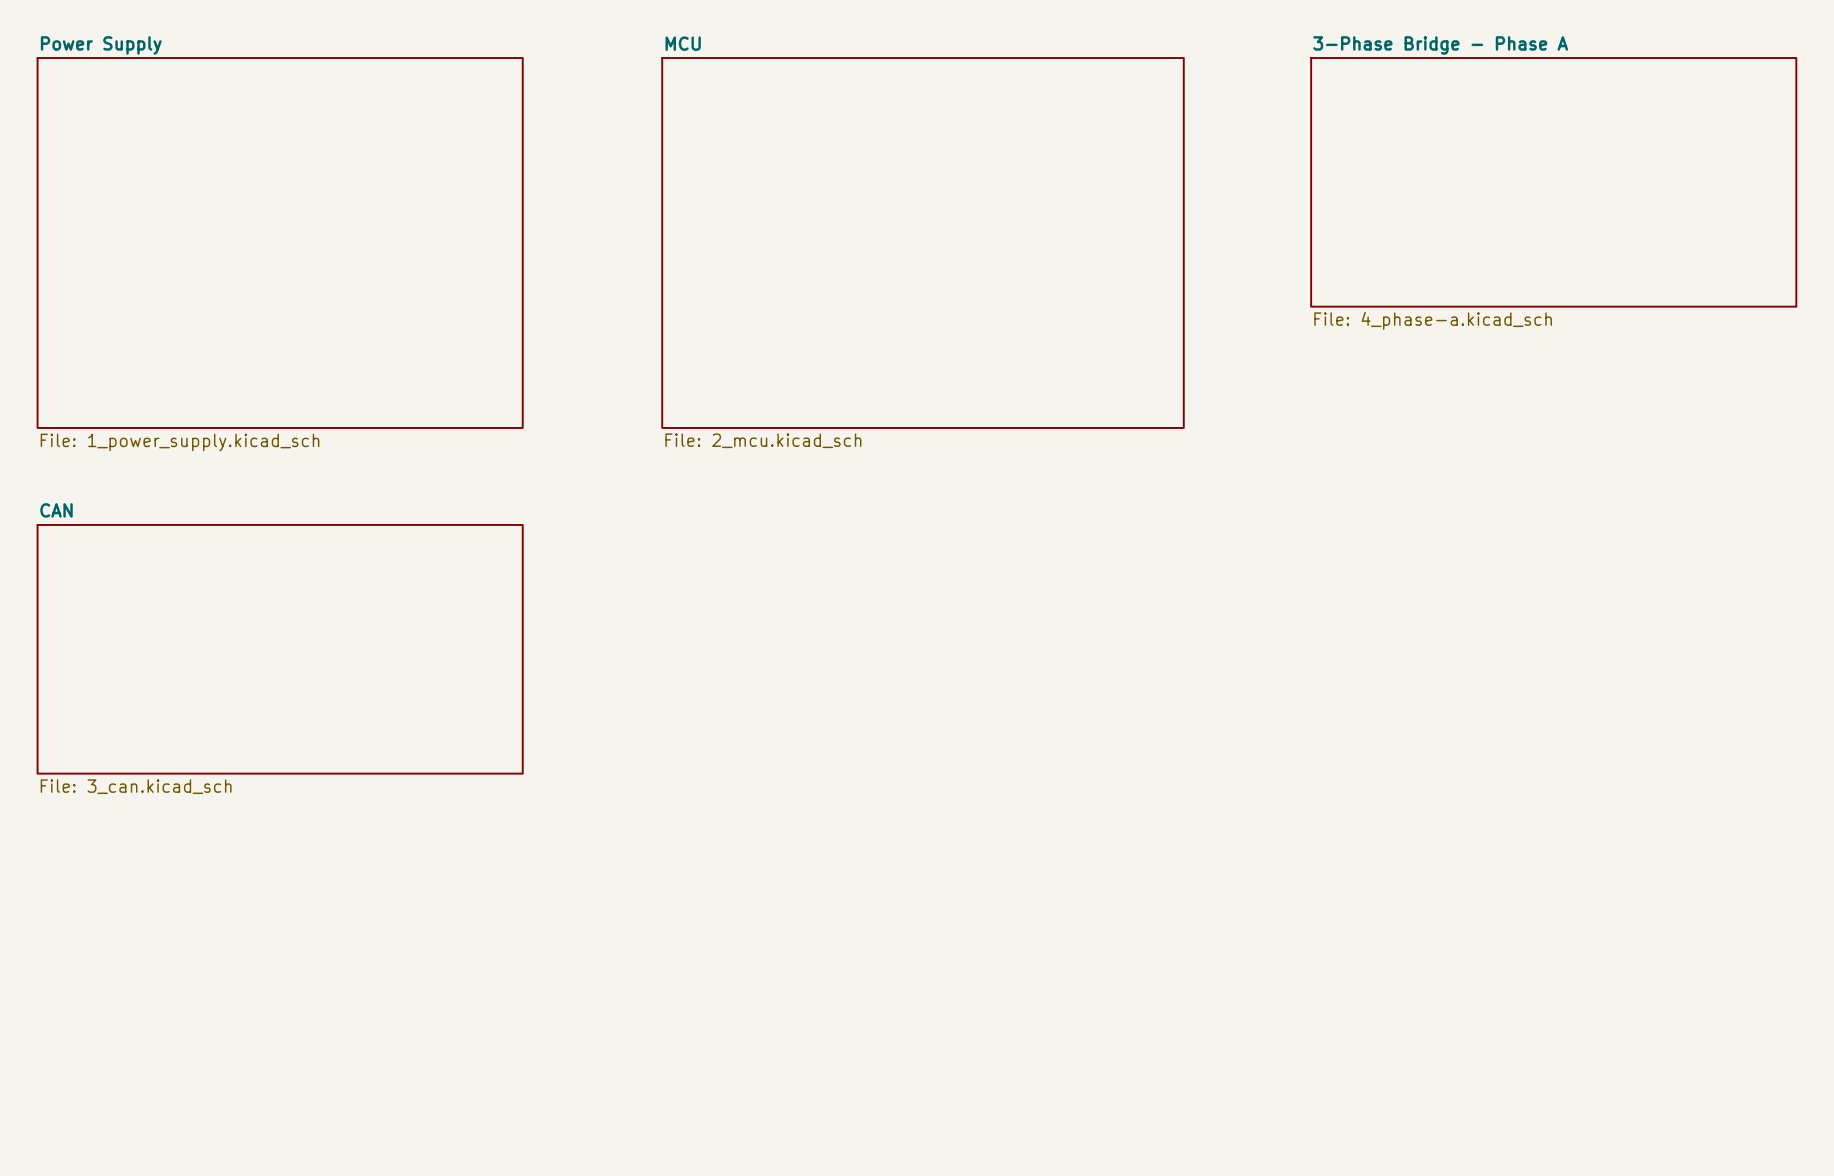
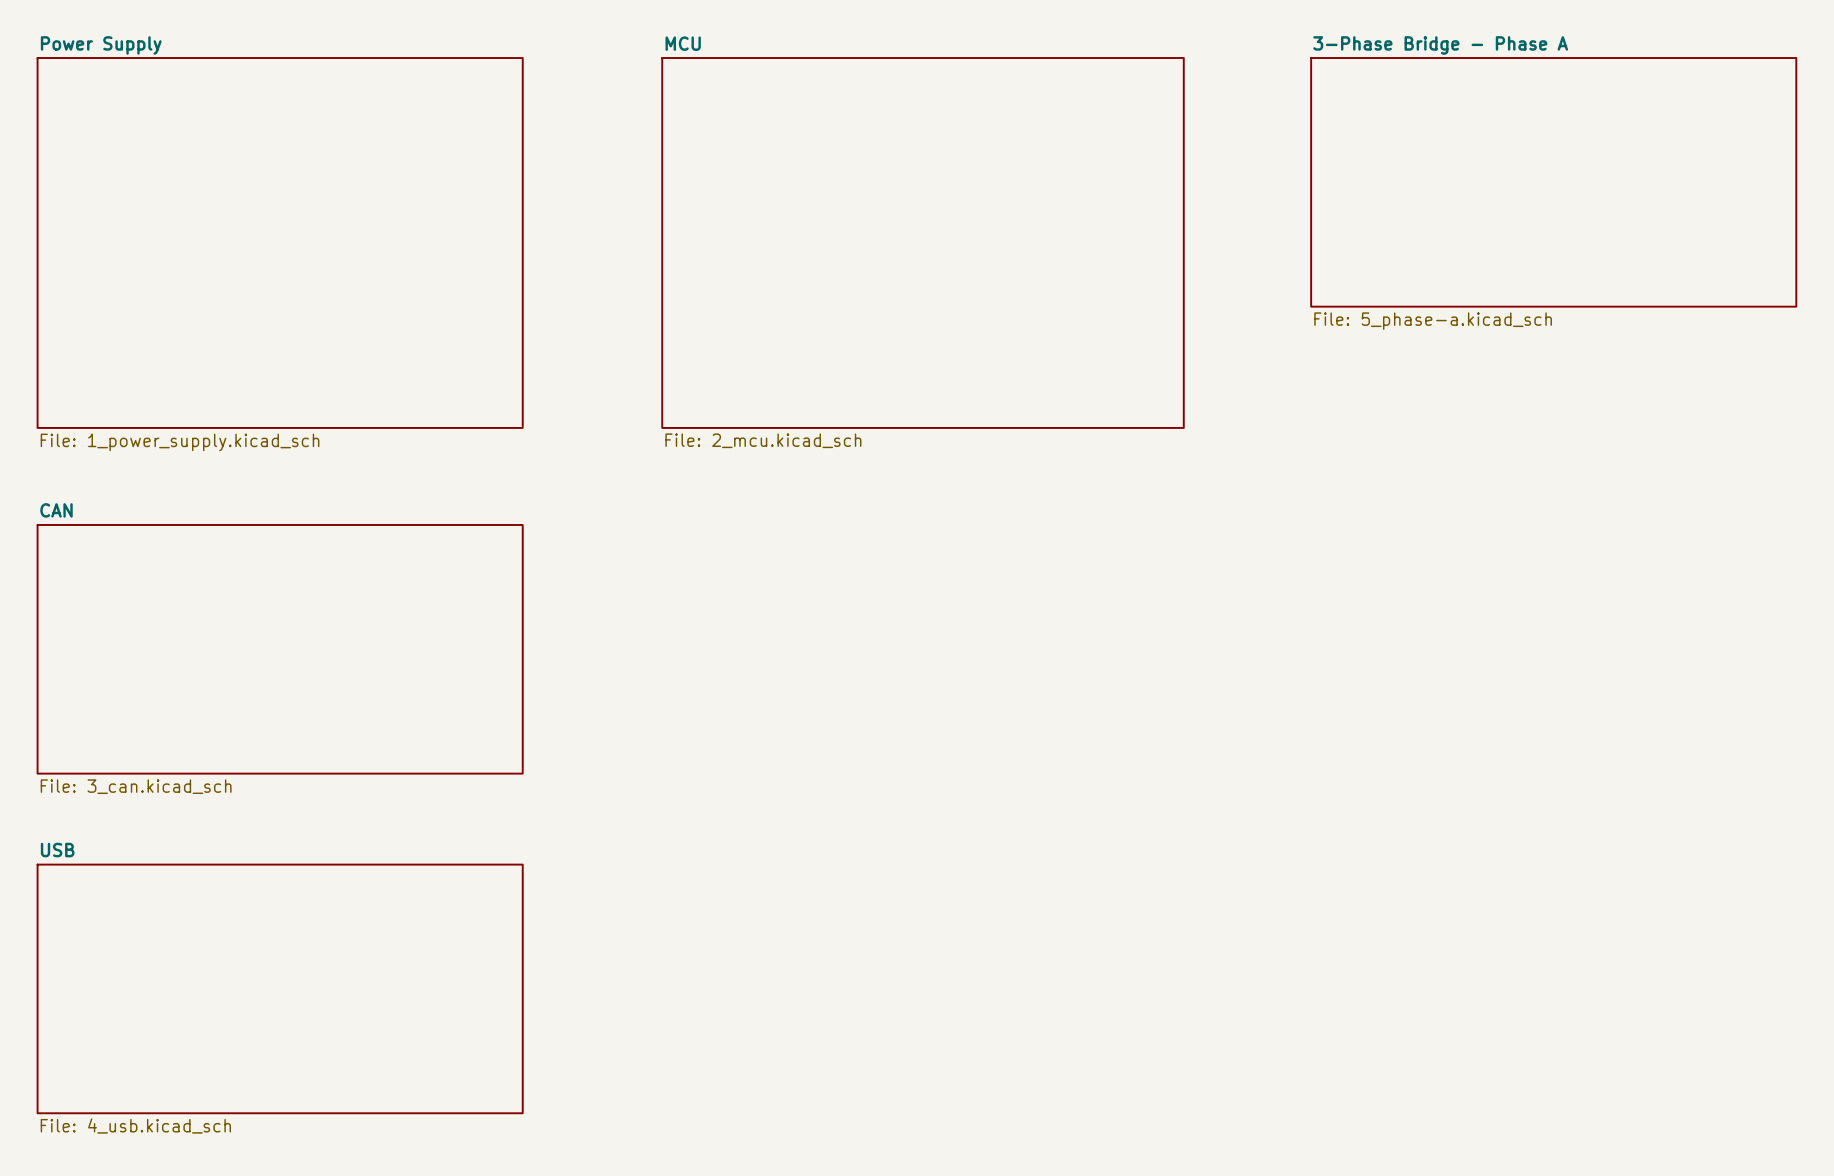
sheet 3-Phase Bridge - Phase A value: File: 4_phase-a.kicad_sch (1433, 320) -> File: 5_phase-a.kicad_sch (1433, 321)
sheet USB: none -> File: 4_usb.kicad_sch (280, 988)

